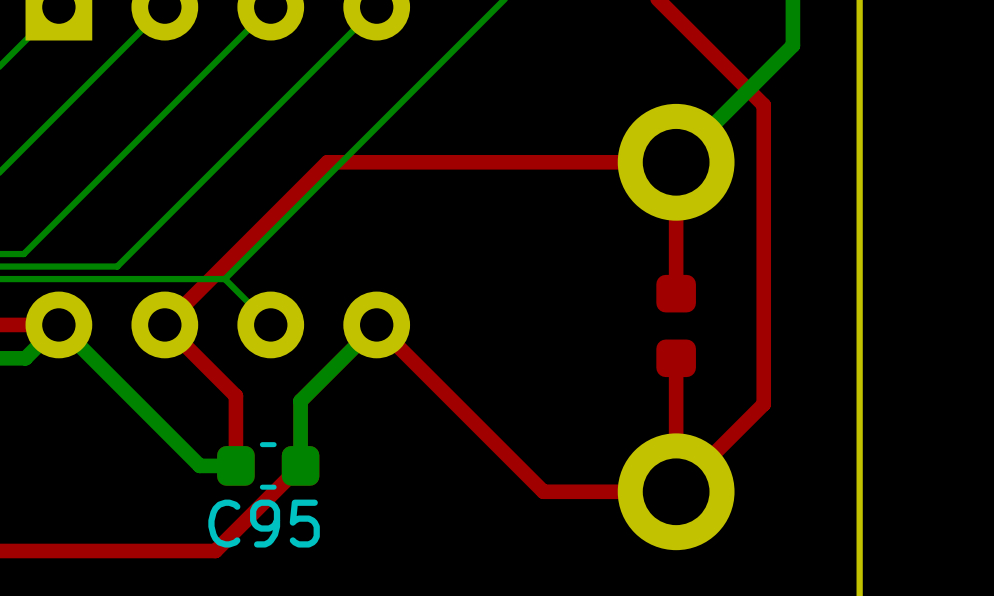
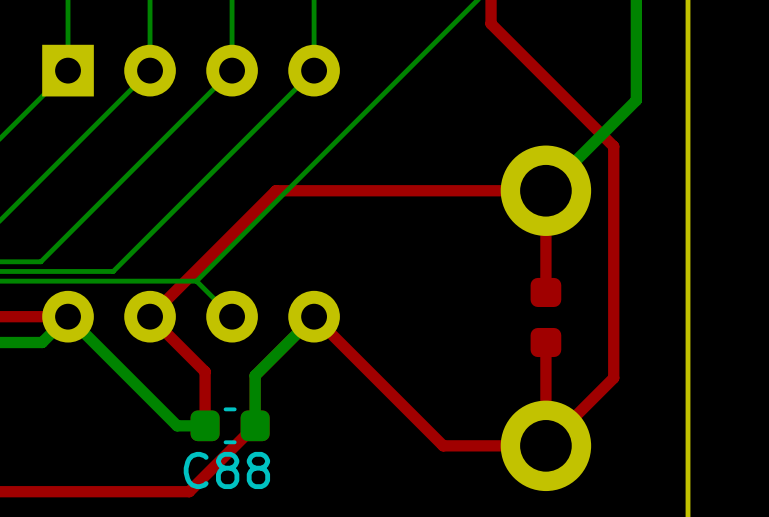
C95 name: C95 (264, 523) -> C88 (226, 470)

